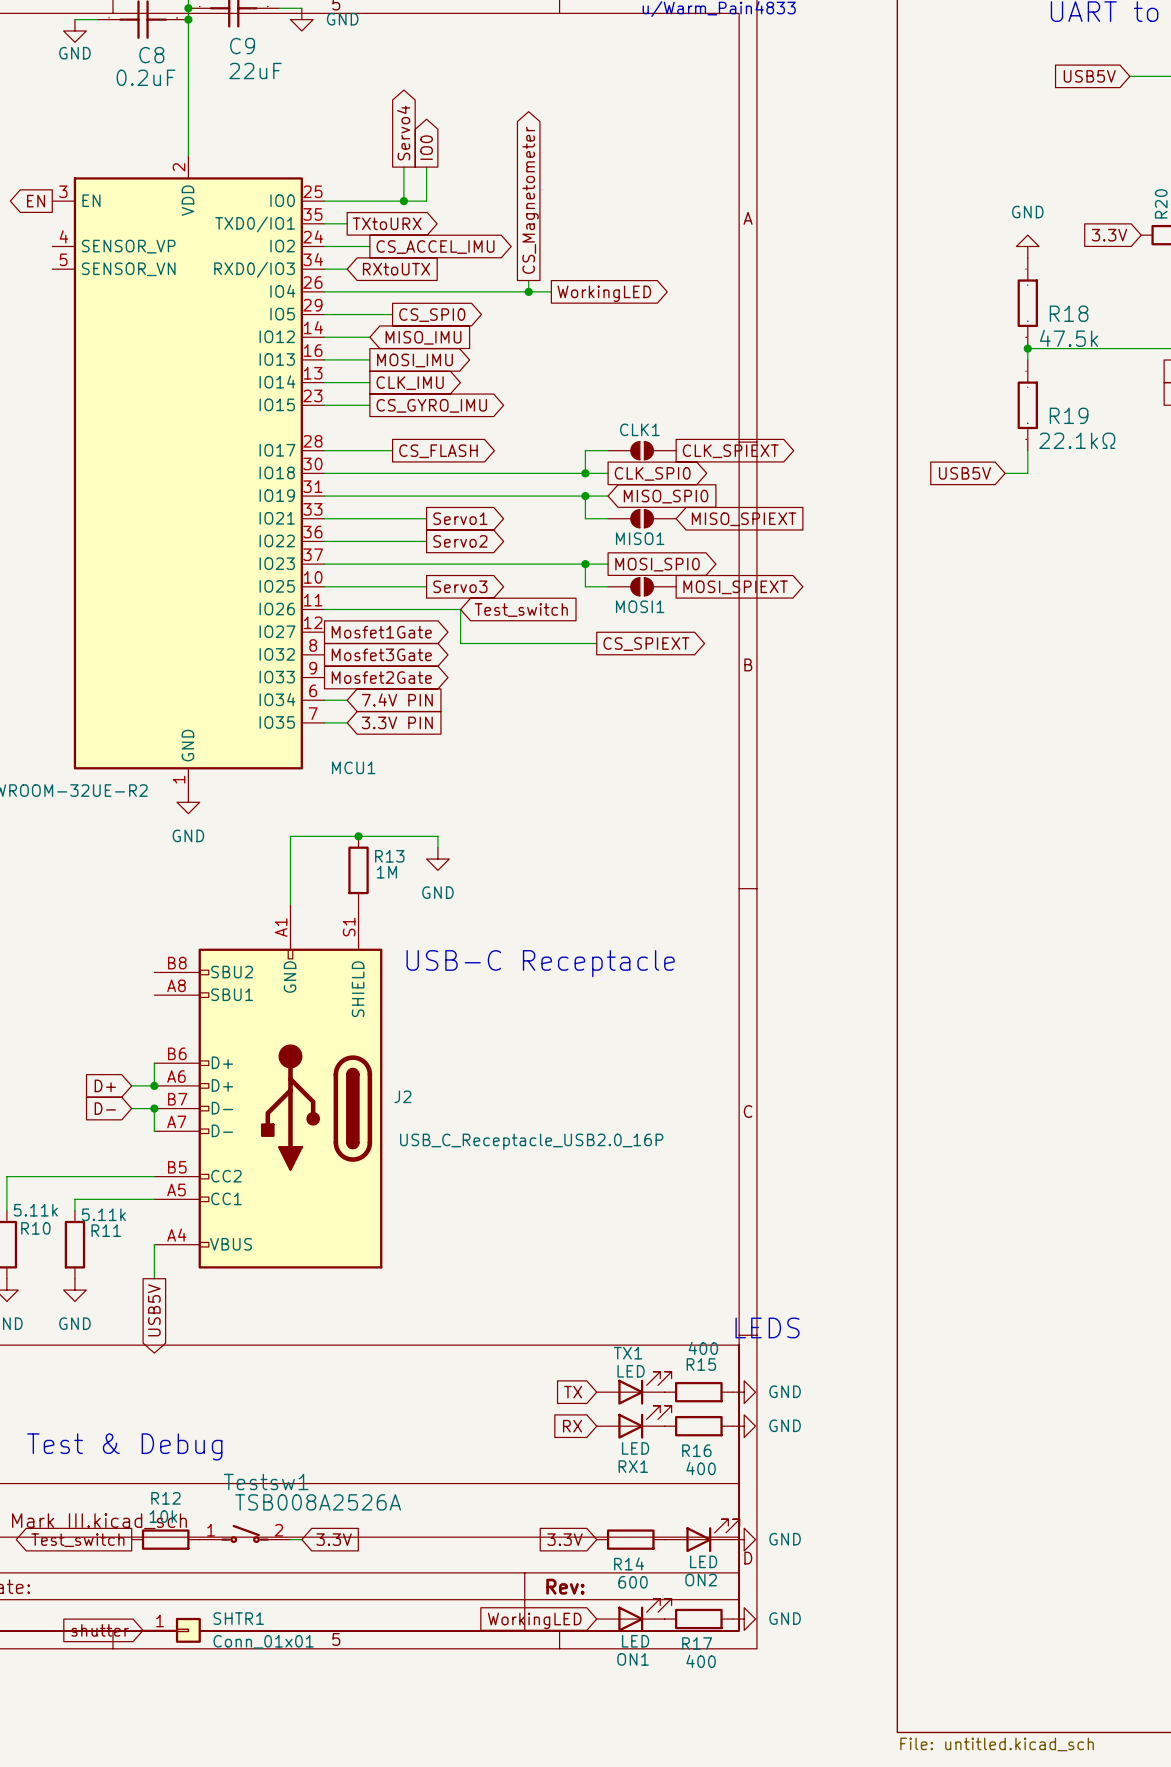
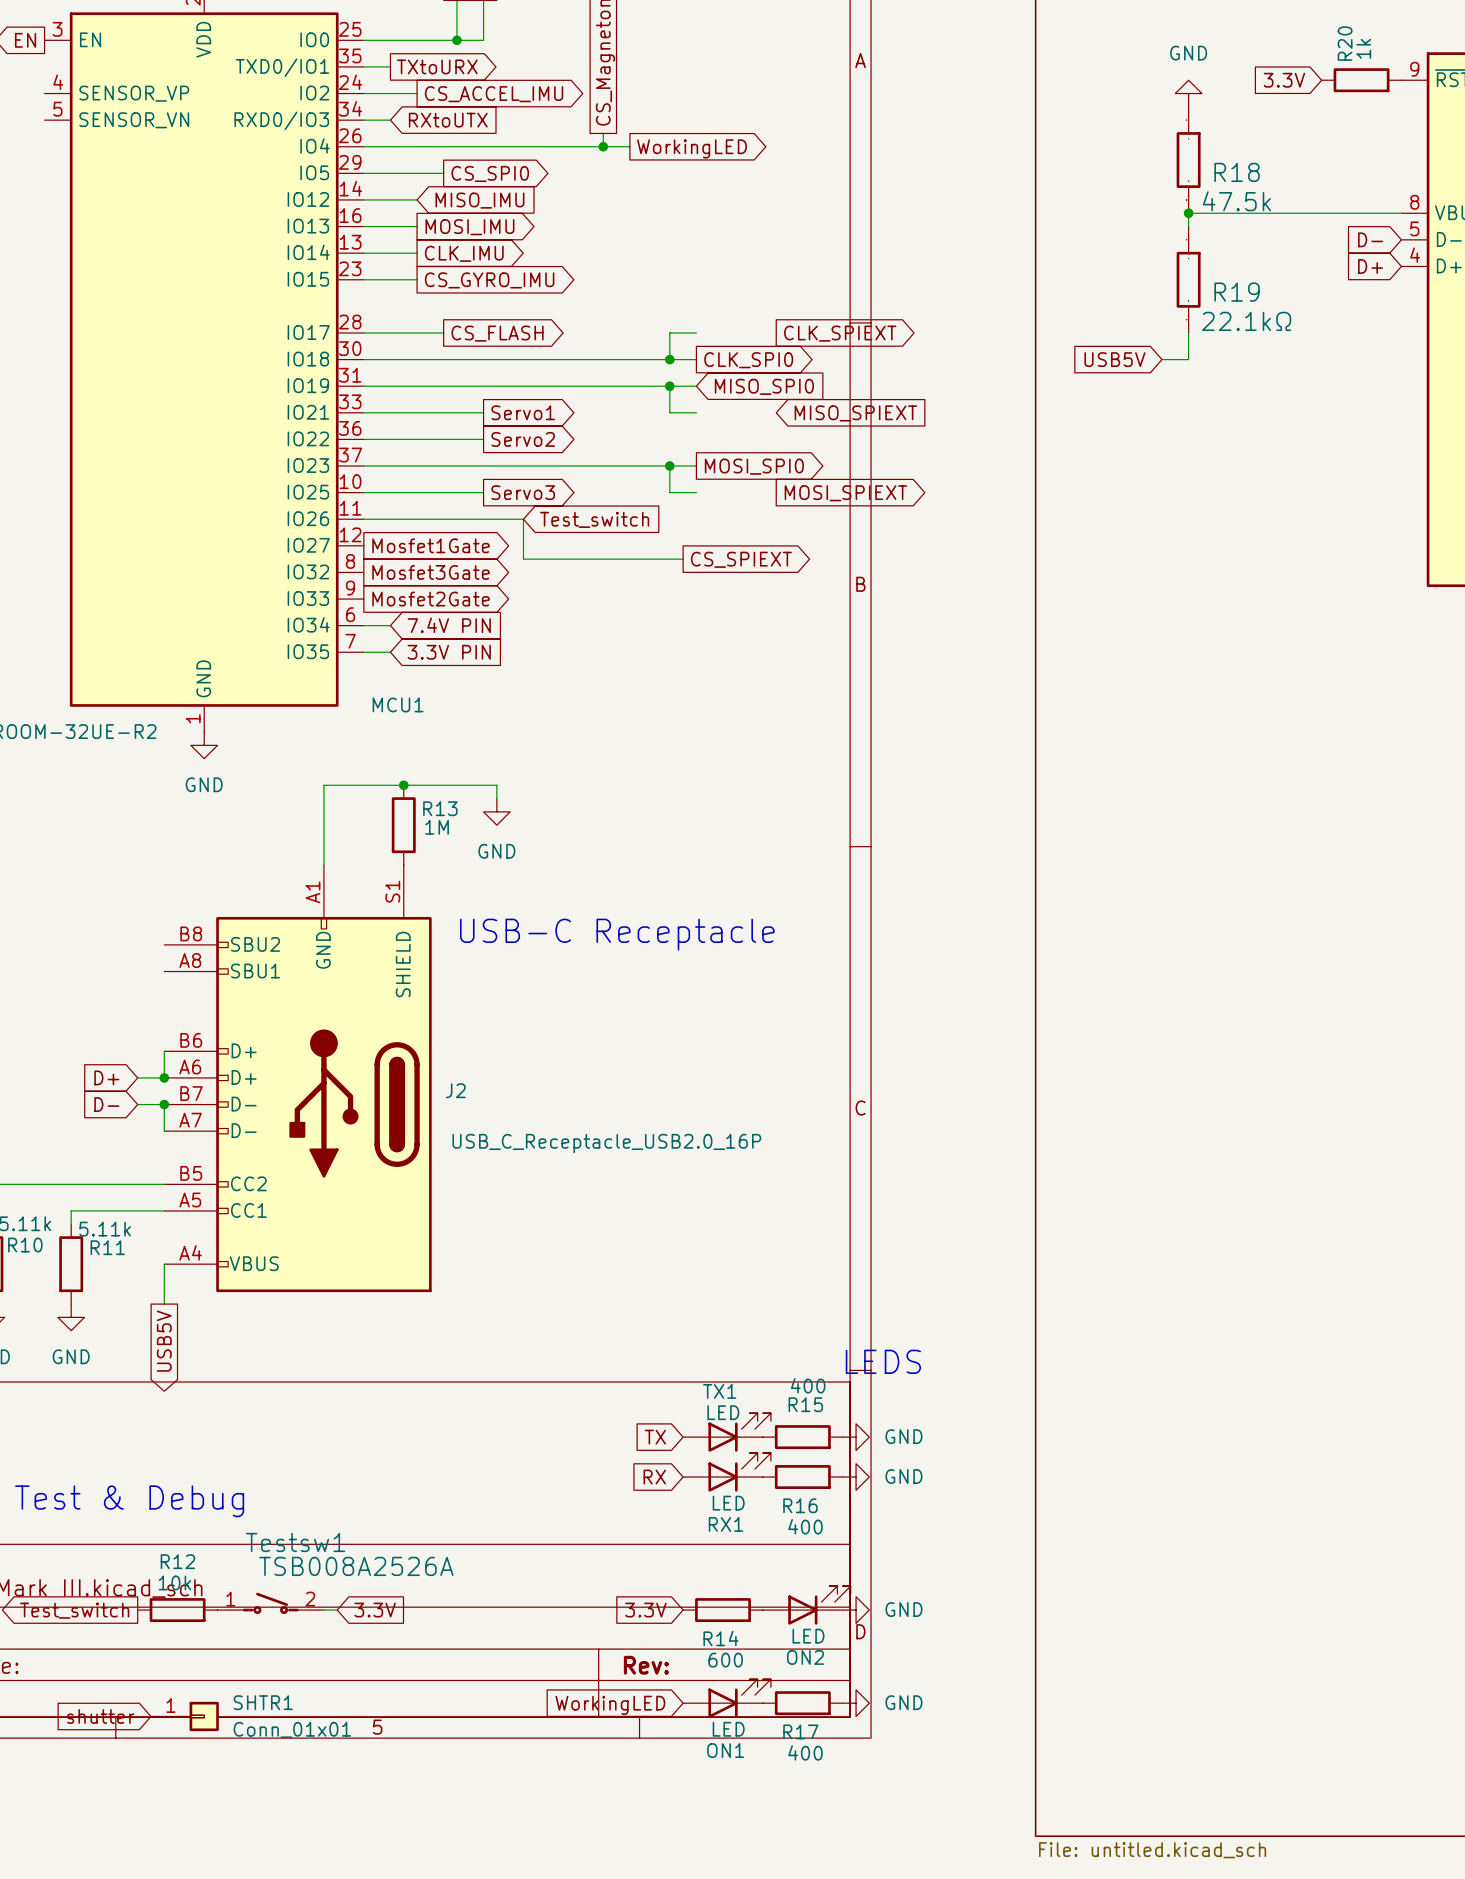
CLK1: (642, 450) -> none
MISO1: (642, 518) -> none
MOSI1: (642, 586) -> none

